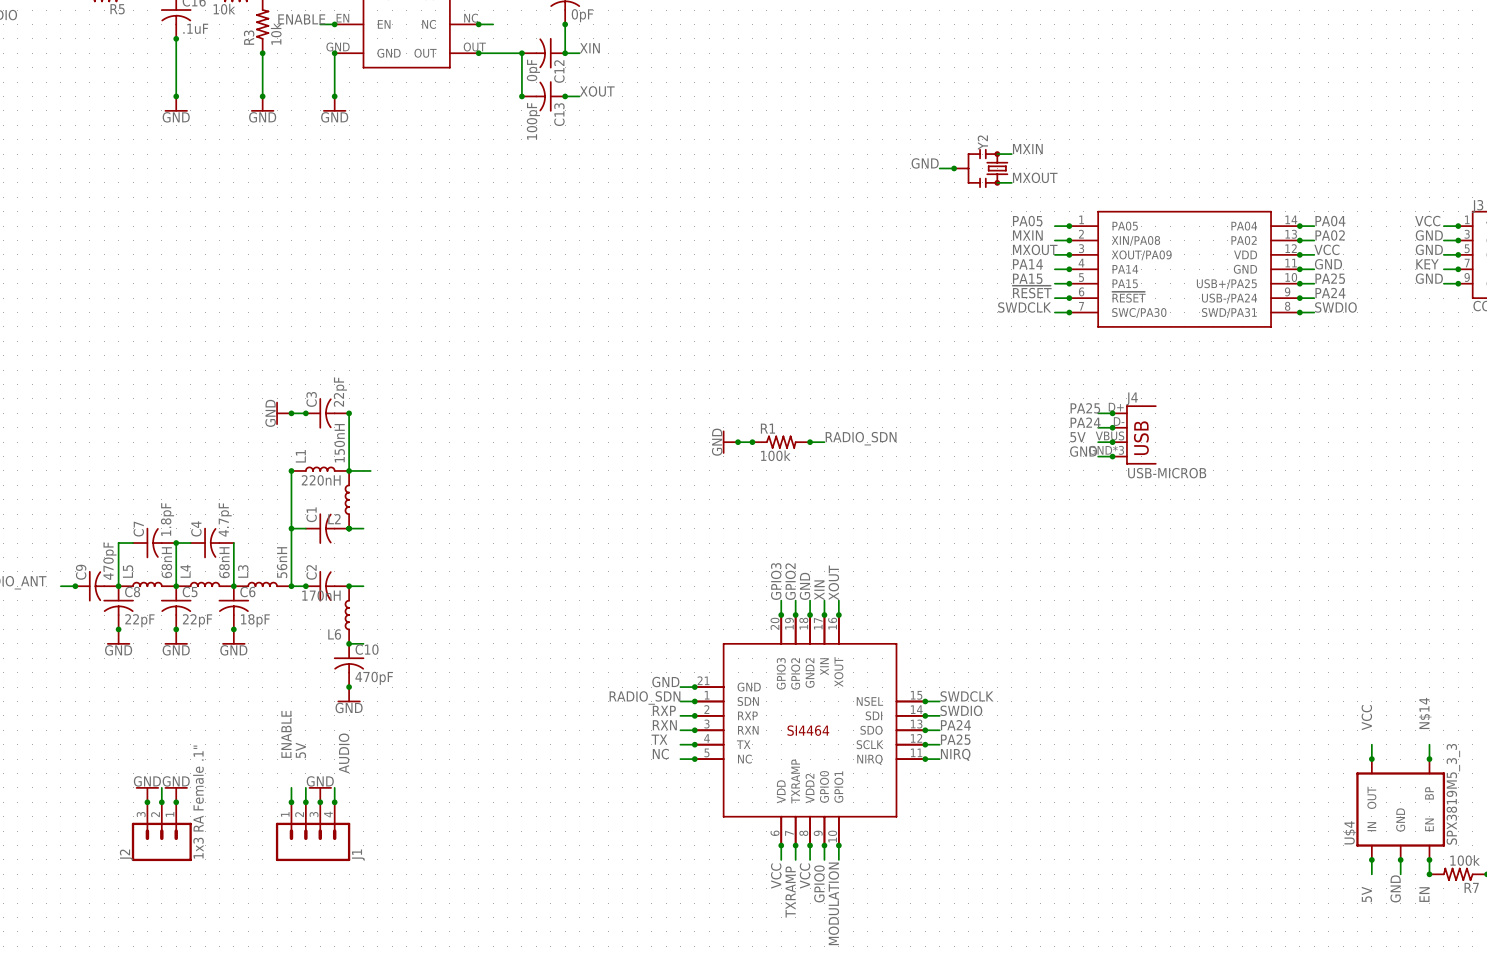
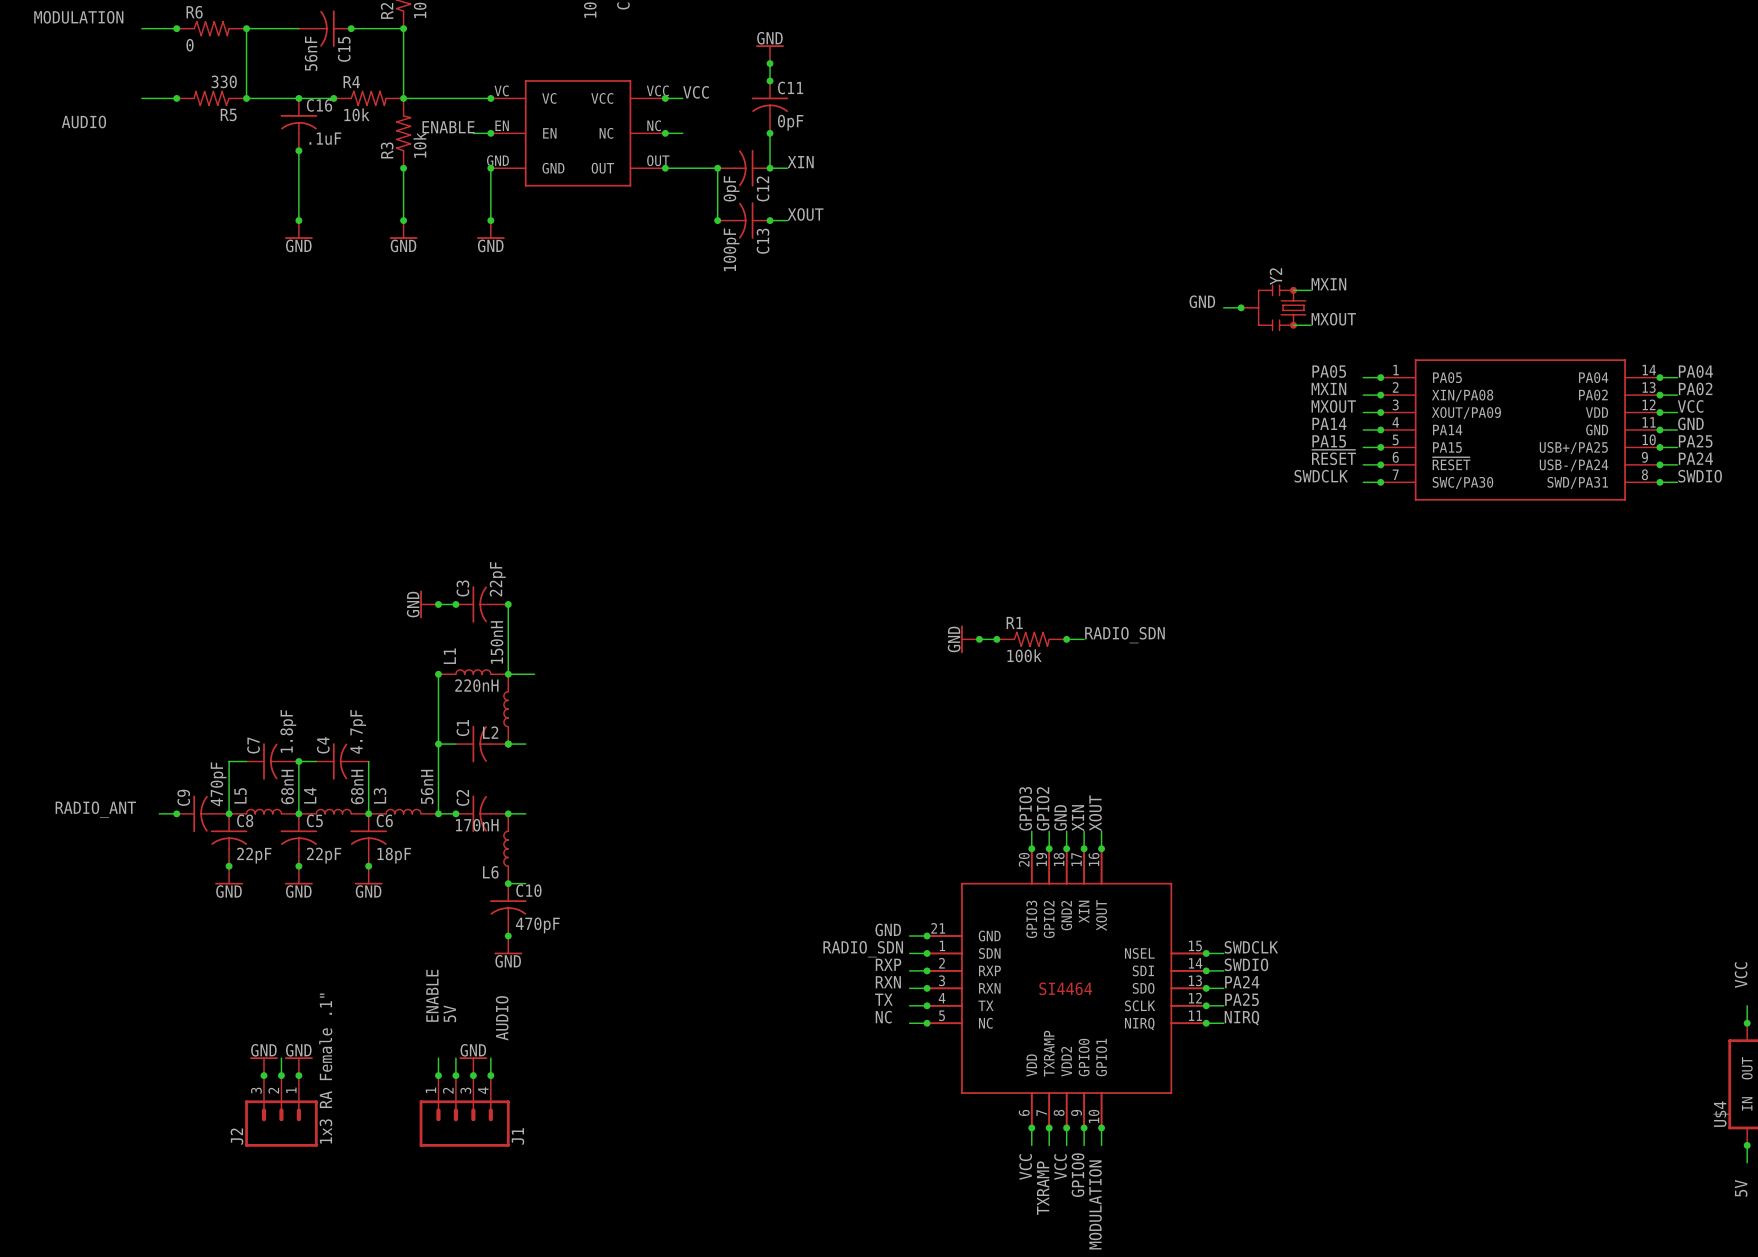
label: PA25 (1085, 408) -> none
wire: (1098, 413) (1112, 413) -> none
junction: (1112, 413) -> none
label: PA24 (1085, 422) -> none
wire: (1098, 427) (1112, 427) -> none
junction: (1112, 427) -> none
J4: USB-MICROB (1134, 434) -> none
label: 5V (1078, 437) -> none
wire: (1098, 442) (1112, 442) -> none
junction: (1112, 442) -> none
label: GND (1083, 451) -> none
wire: (1098, 456) (1112, 456) -> none
junction: (1112, 456) -> none

